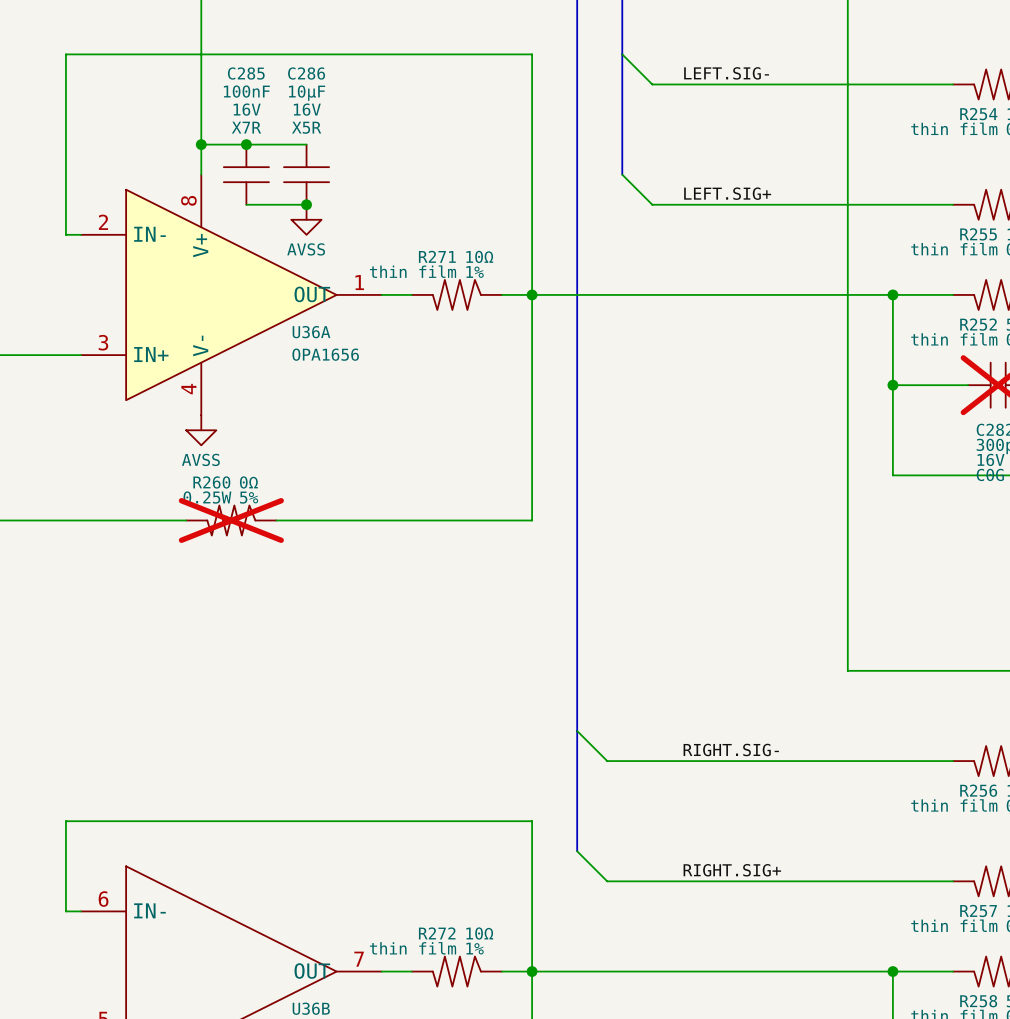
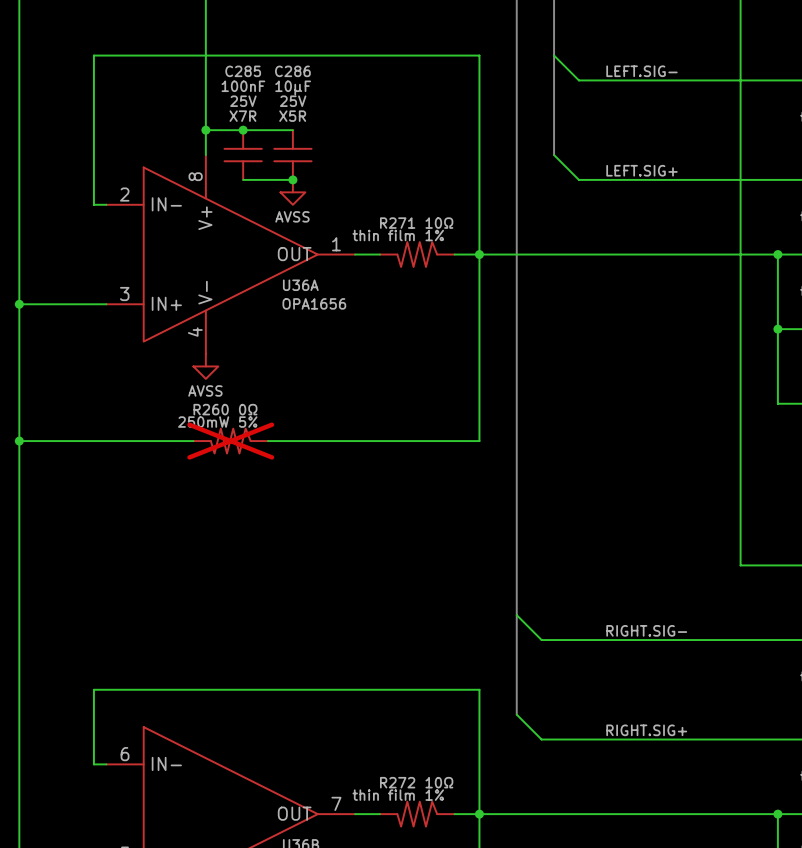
C285 text: 16V (247, 109) -> 25V (243, 101)
C286 text: 16V (307, 109) -> 25V (293, 101)
R260 text: 0.25W (207, 497) -> 250mW (203, 422)

